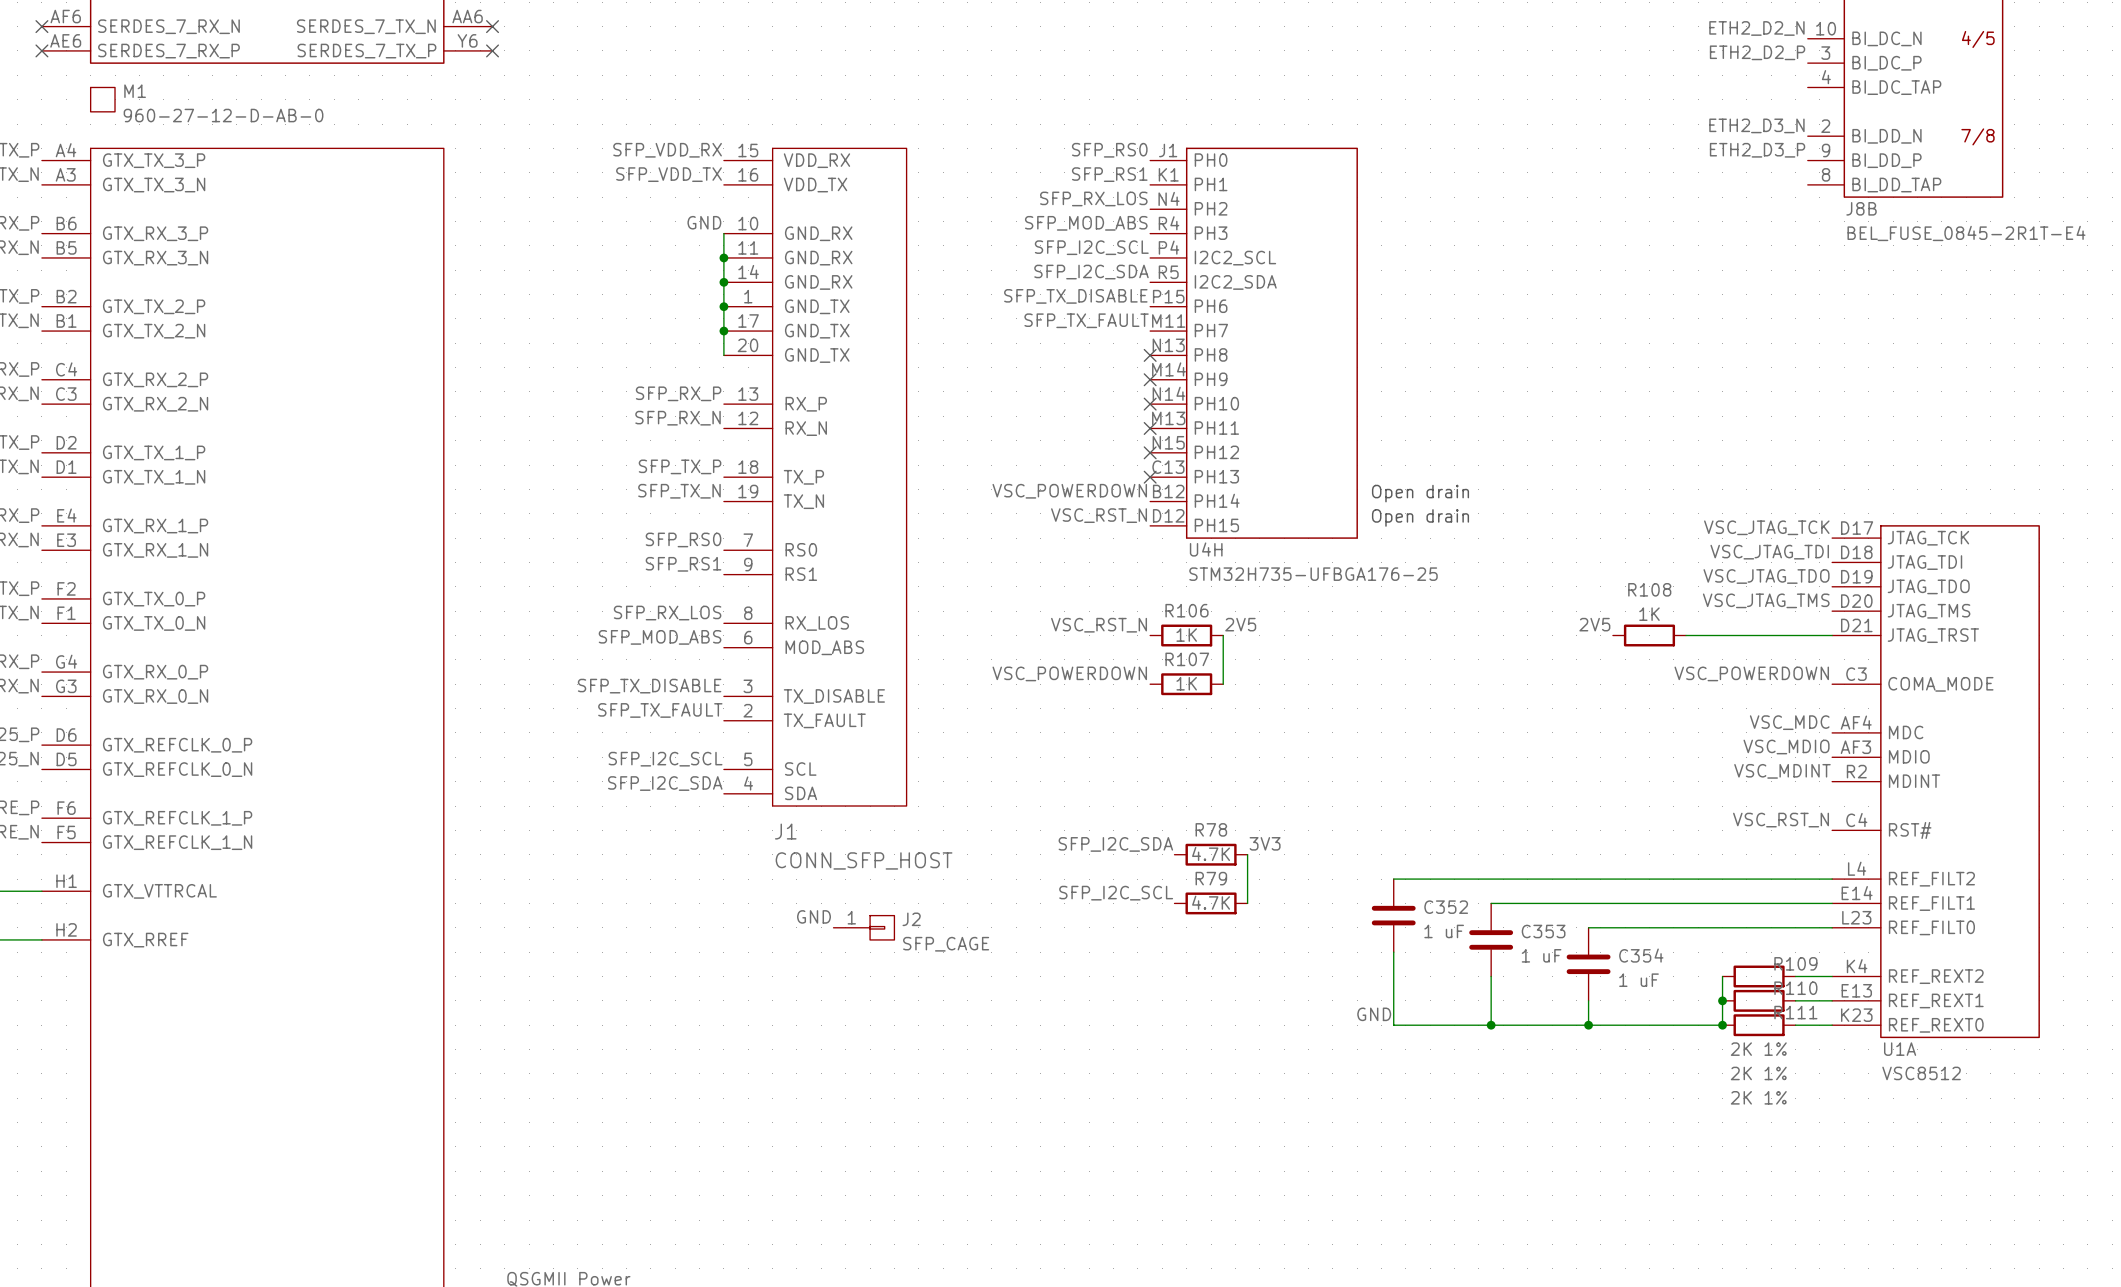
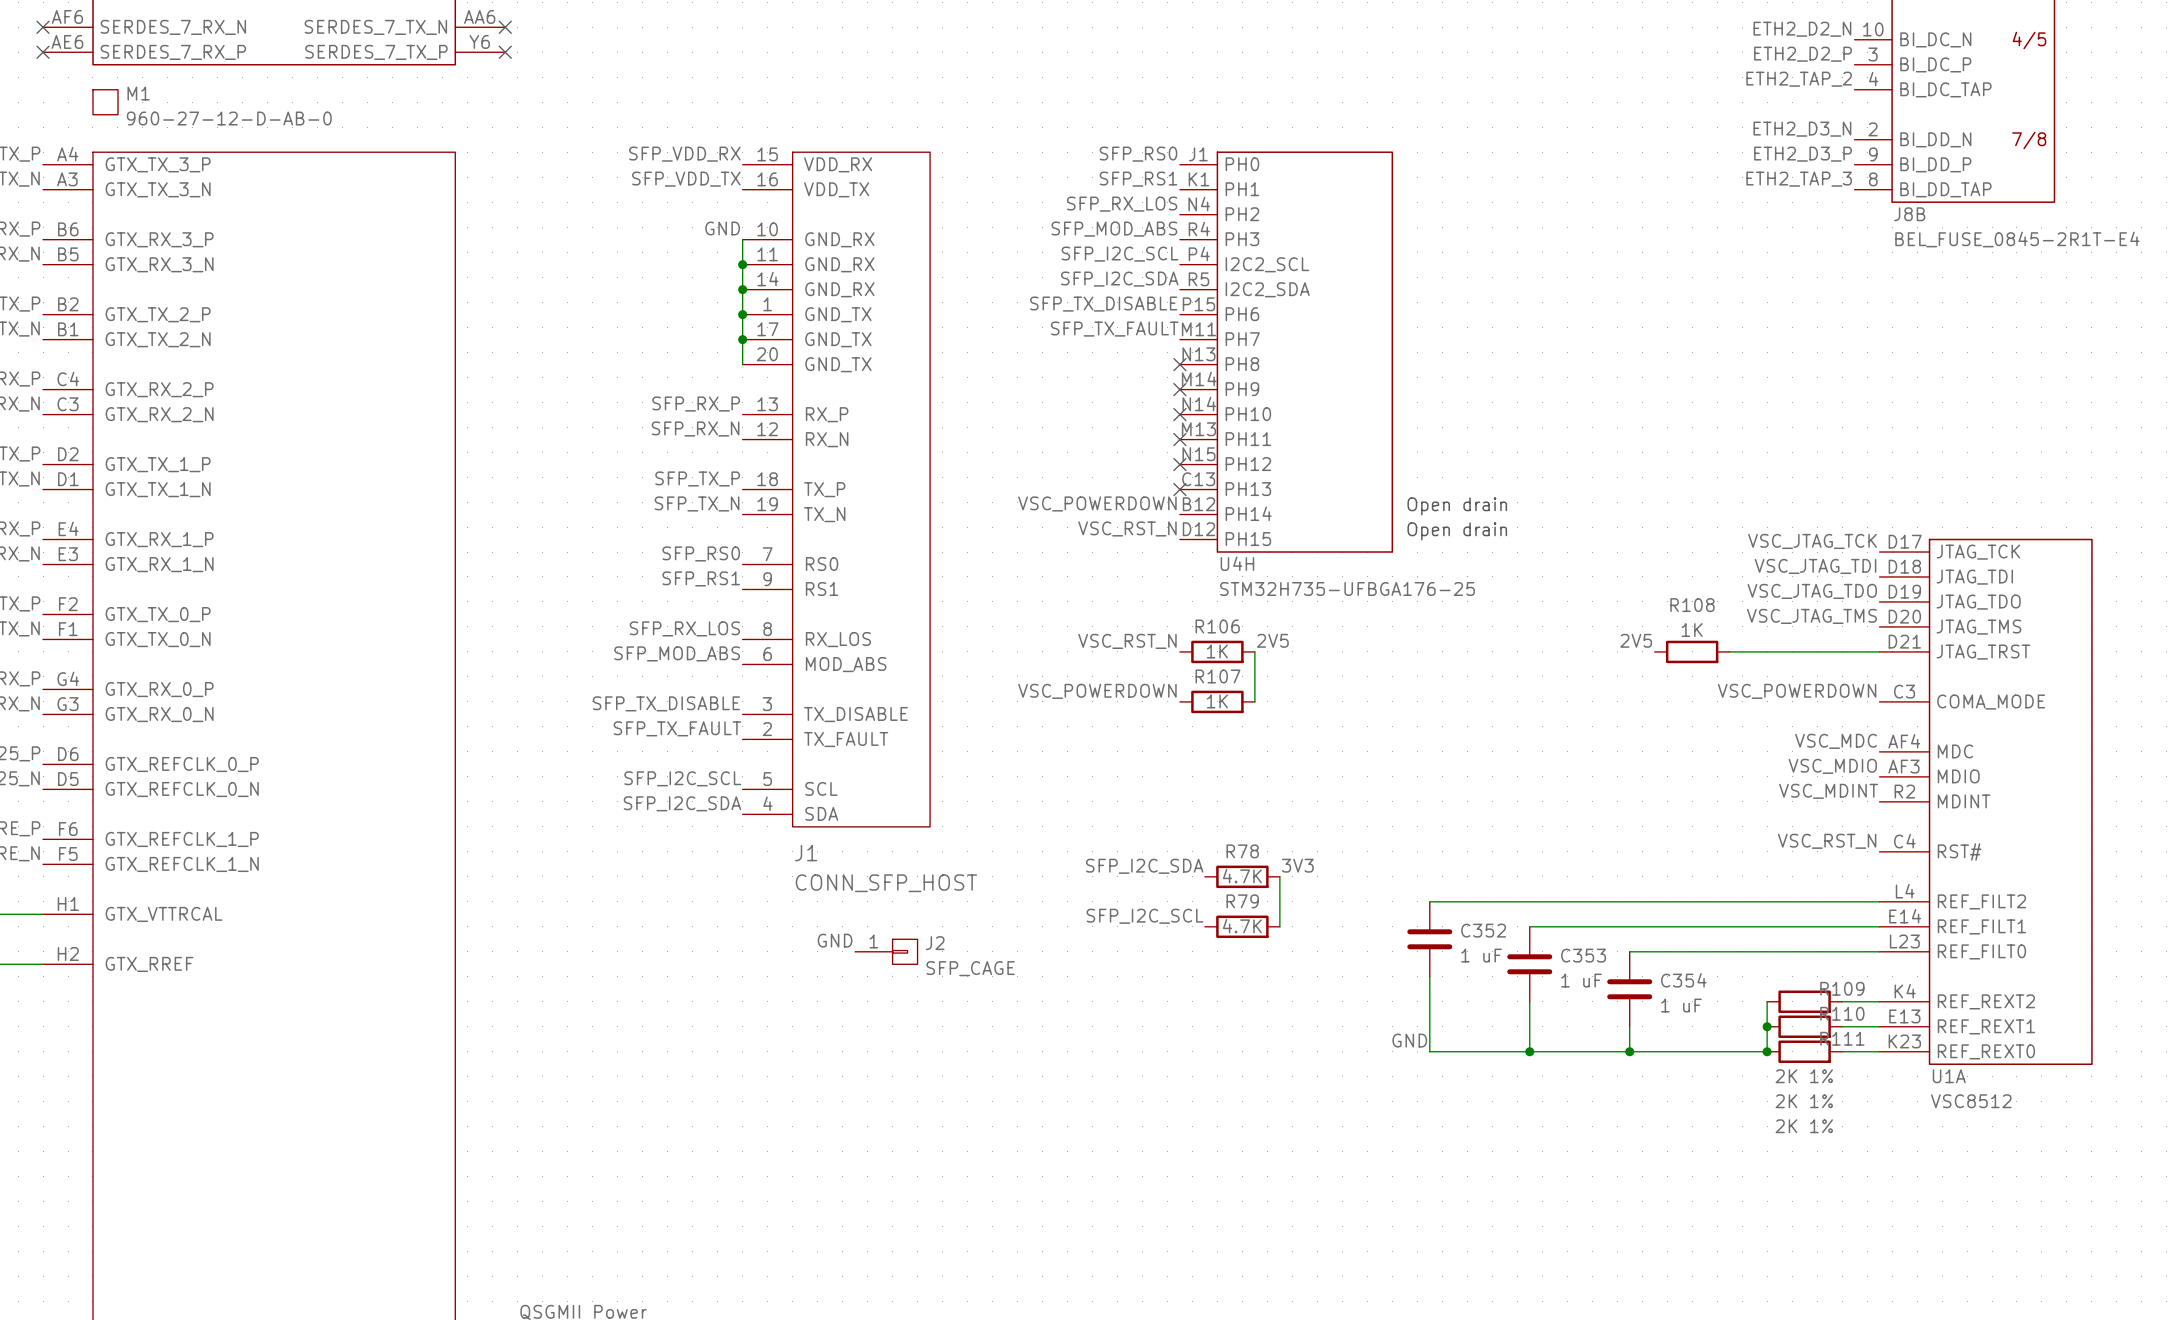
label: none -> ETH2_TAP_2 (1799, 79)
label: none -> ETH2_TAP_3 (1799, 179)

